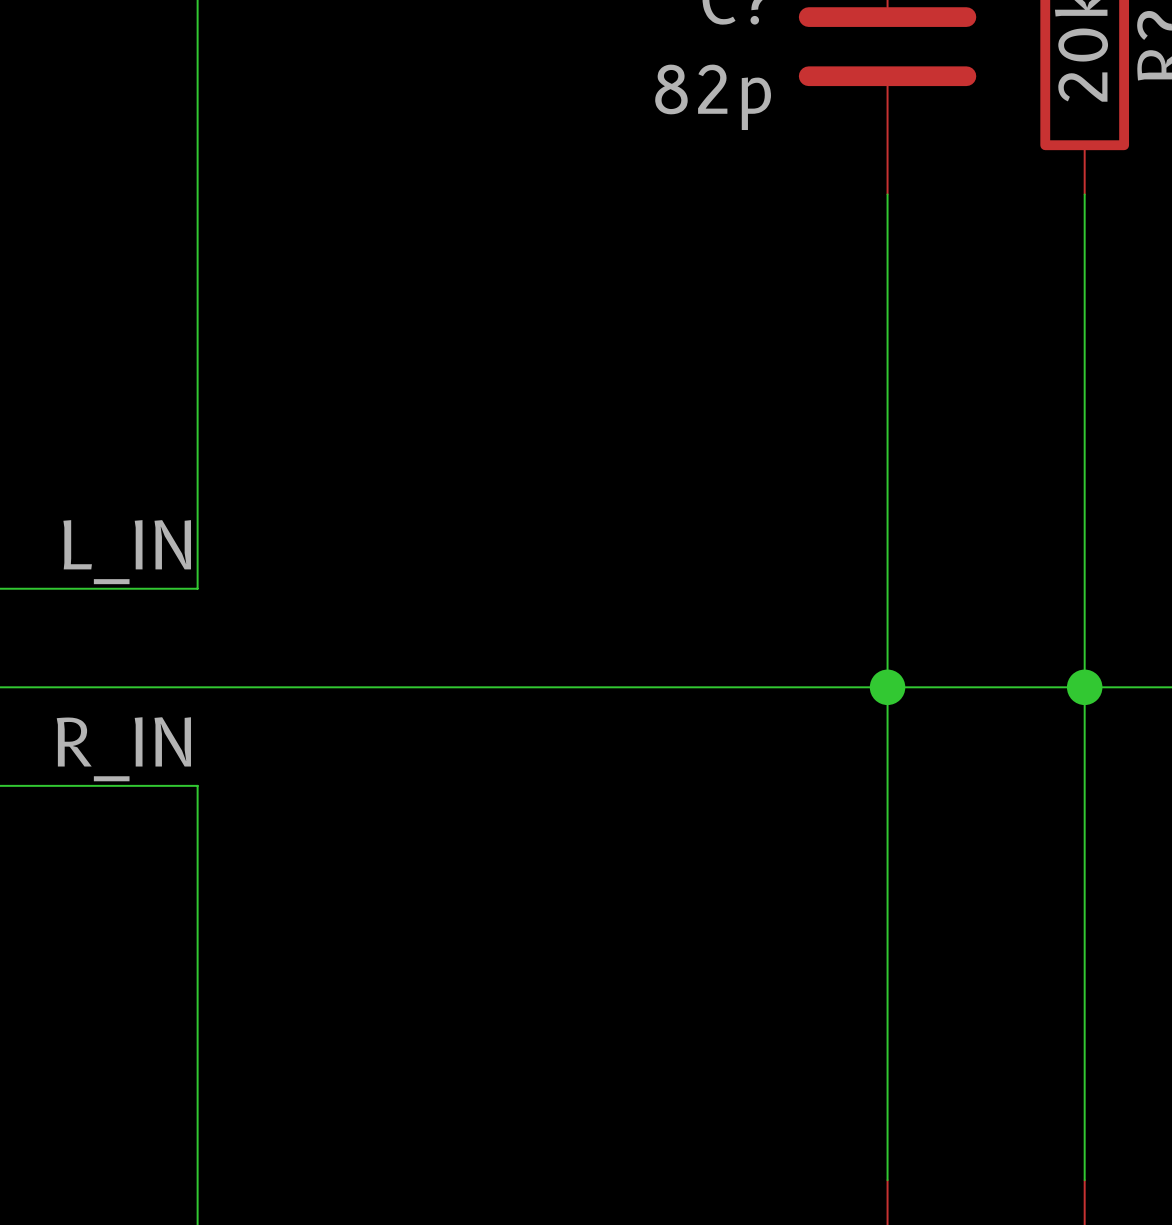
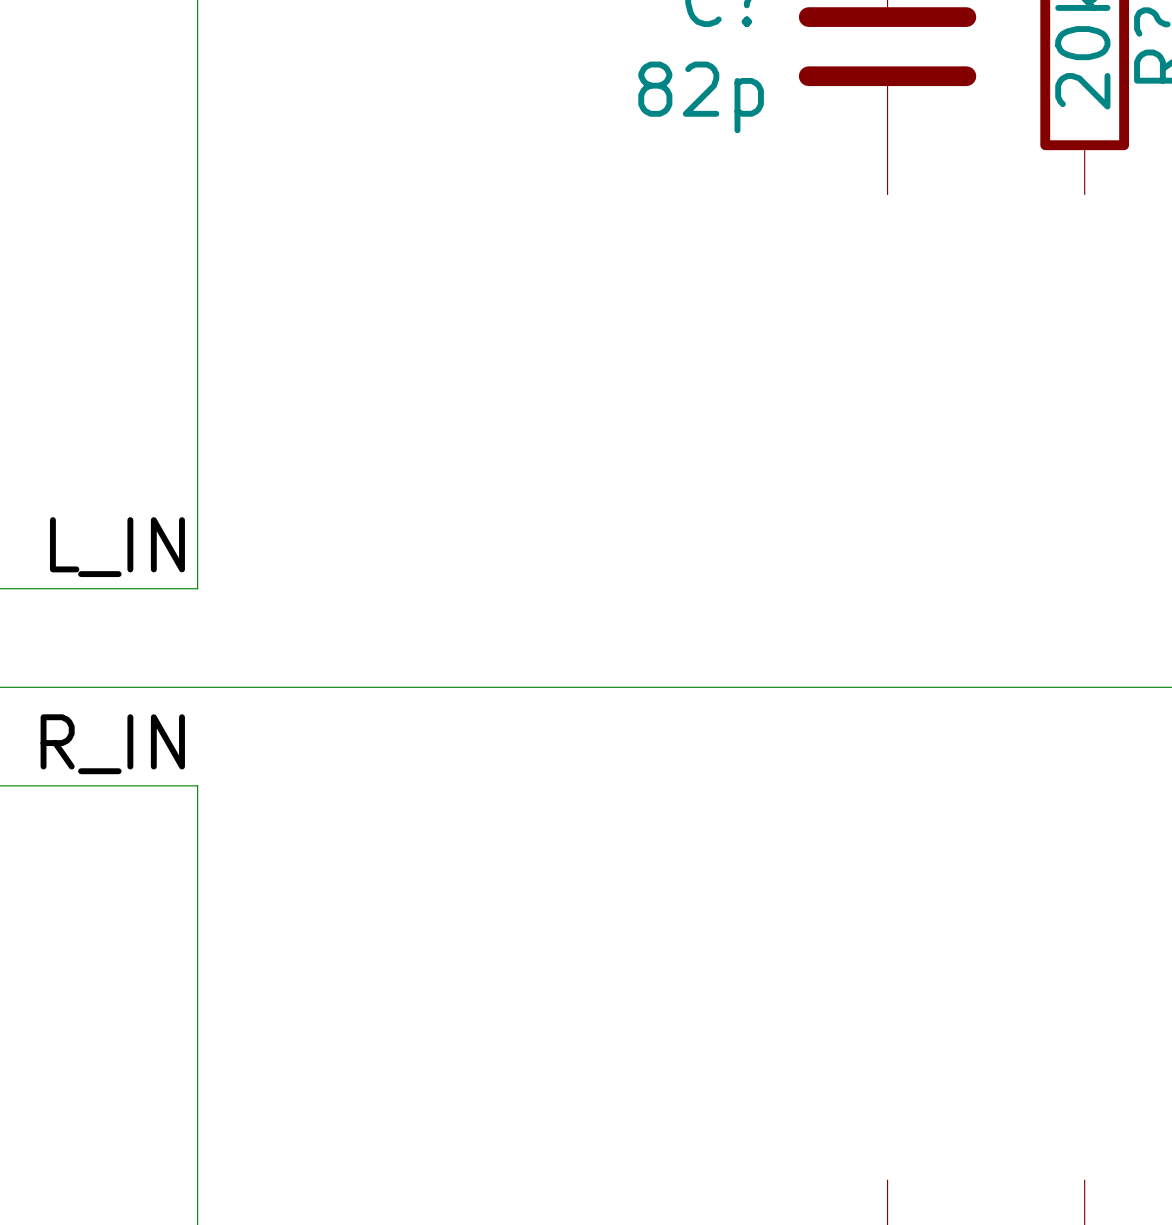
wire: (887, 194) (887, 1180) -> none
wire: (1084, 194) (1084, 1180) -> none
junction: (887, 687) -> none
junction: (1084, 687) -> none

